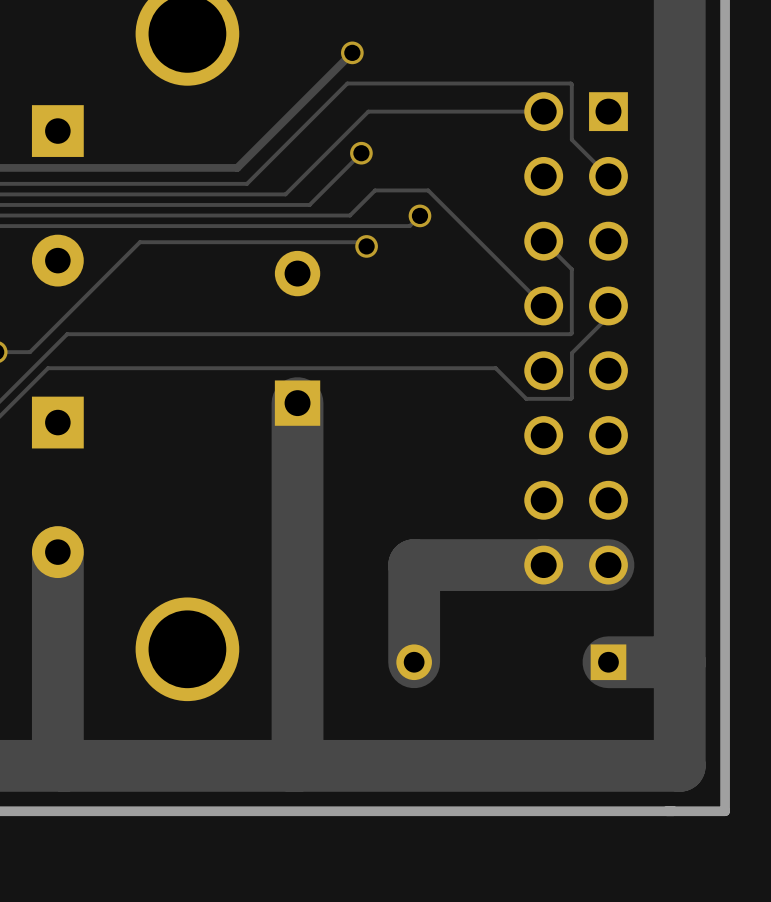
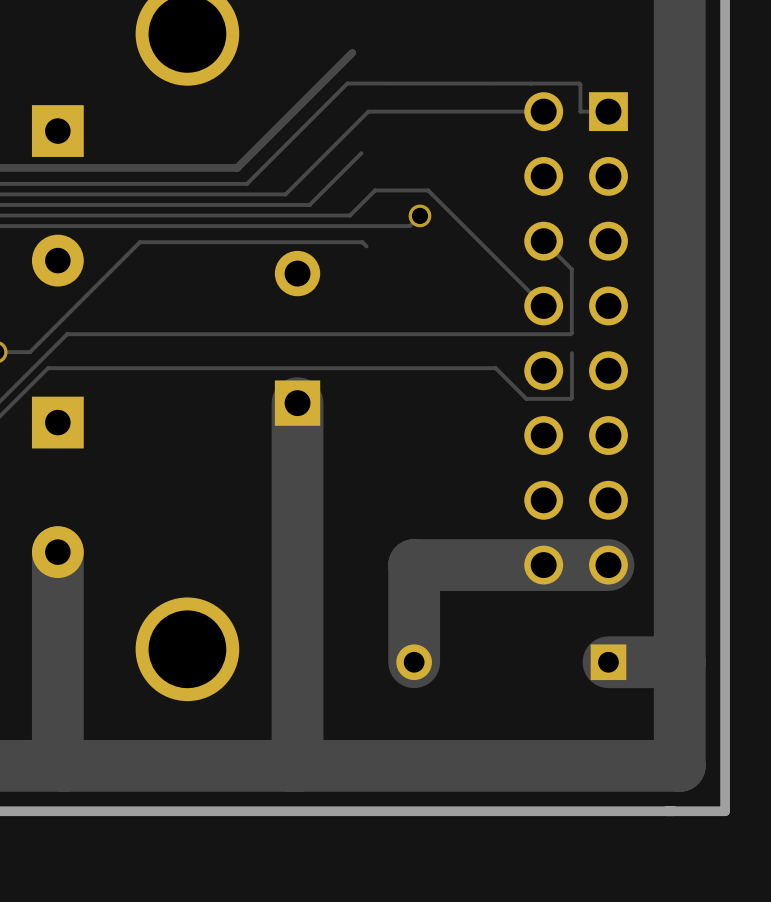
via: (352, 52) -> none
track: (570, 83) (571, 139) (608, 176) -> (570, 83) (580, 84) (580, 111) (608, 111)
via: (361, 153) -> none
via: (366, 246) -> none
track: (608, 305) (608, 316) (571, 353) -> none

